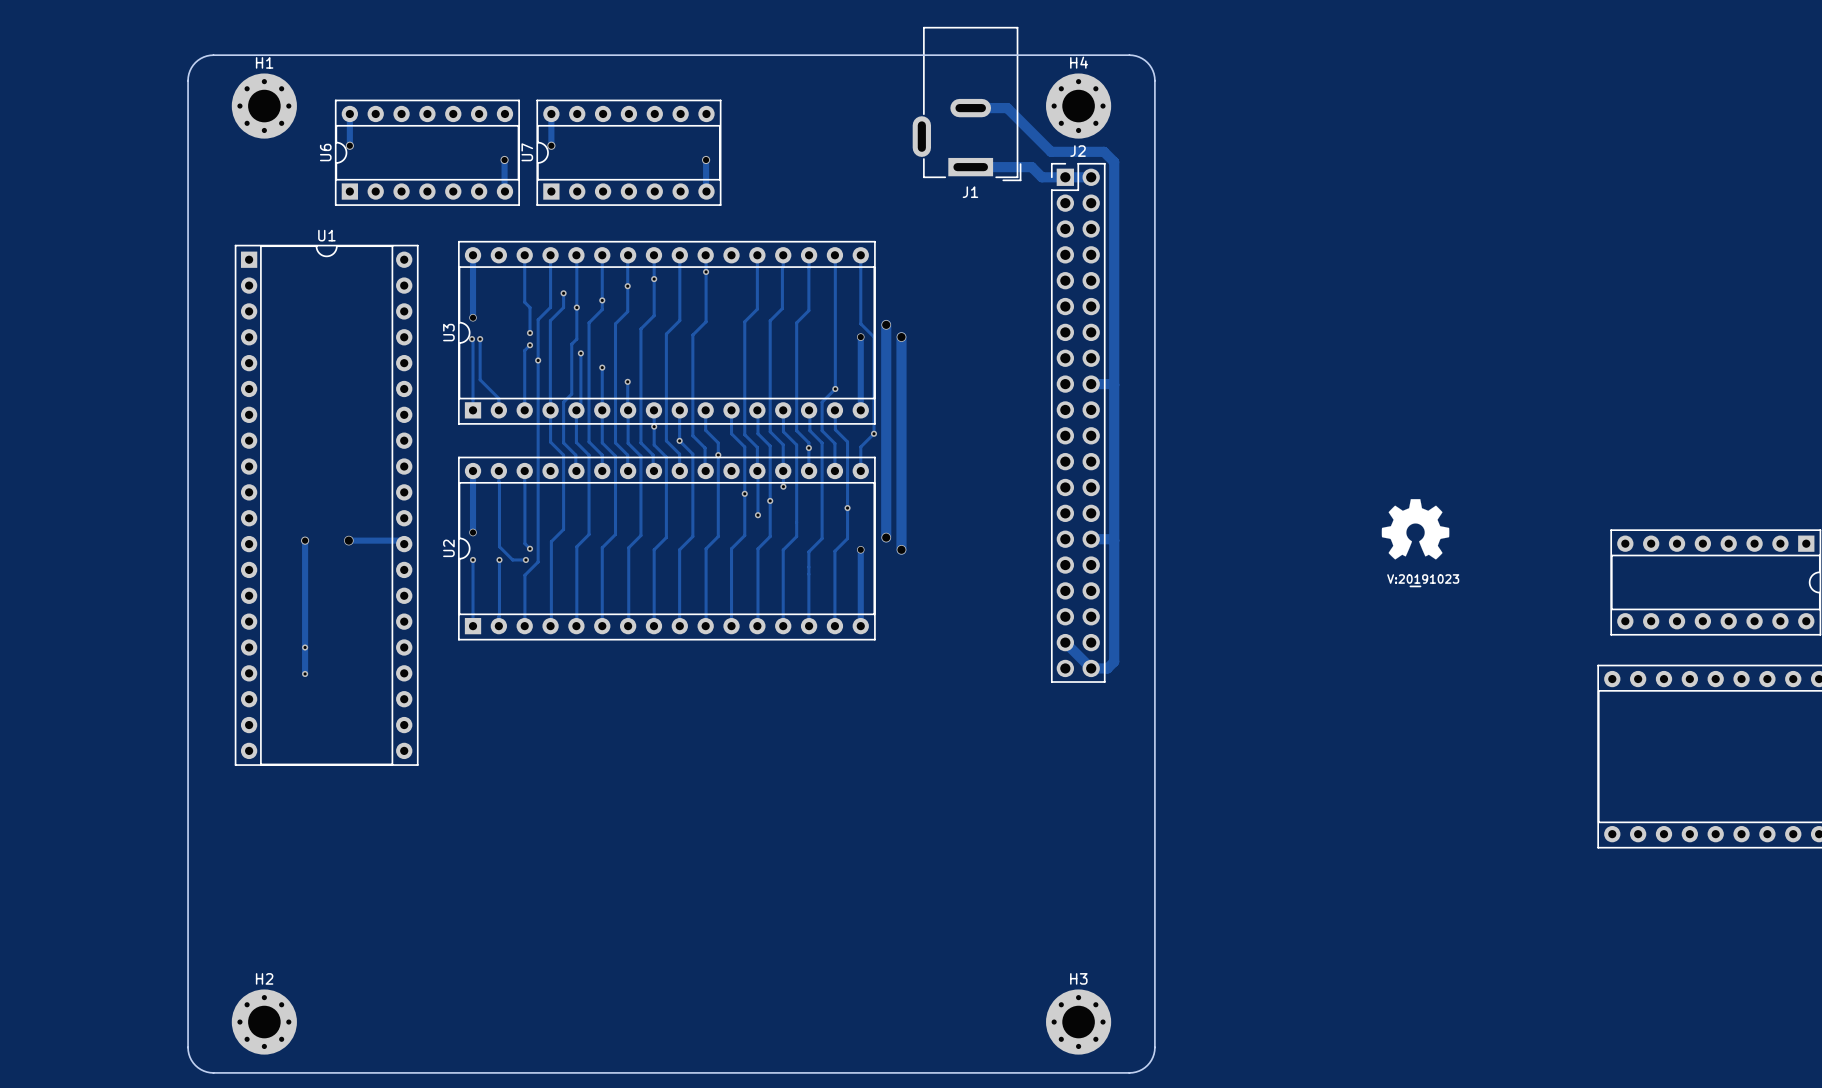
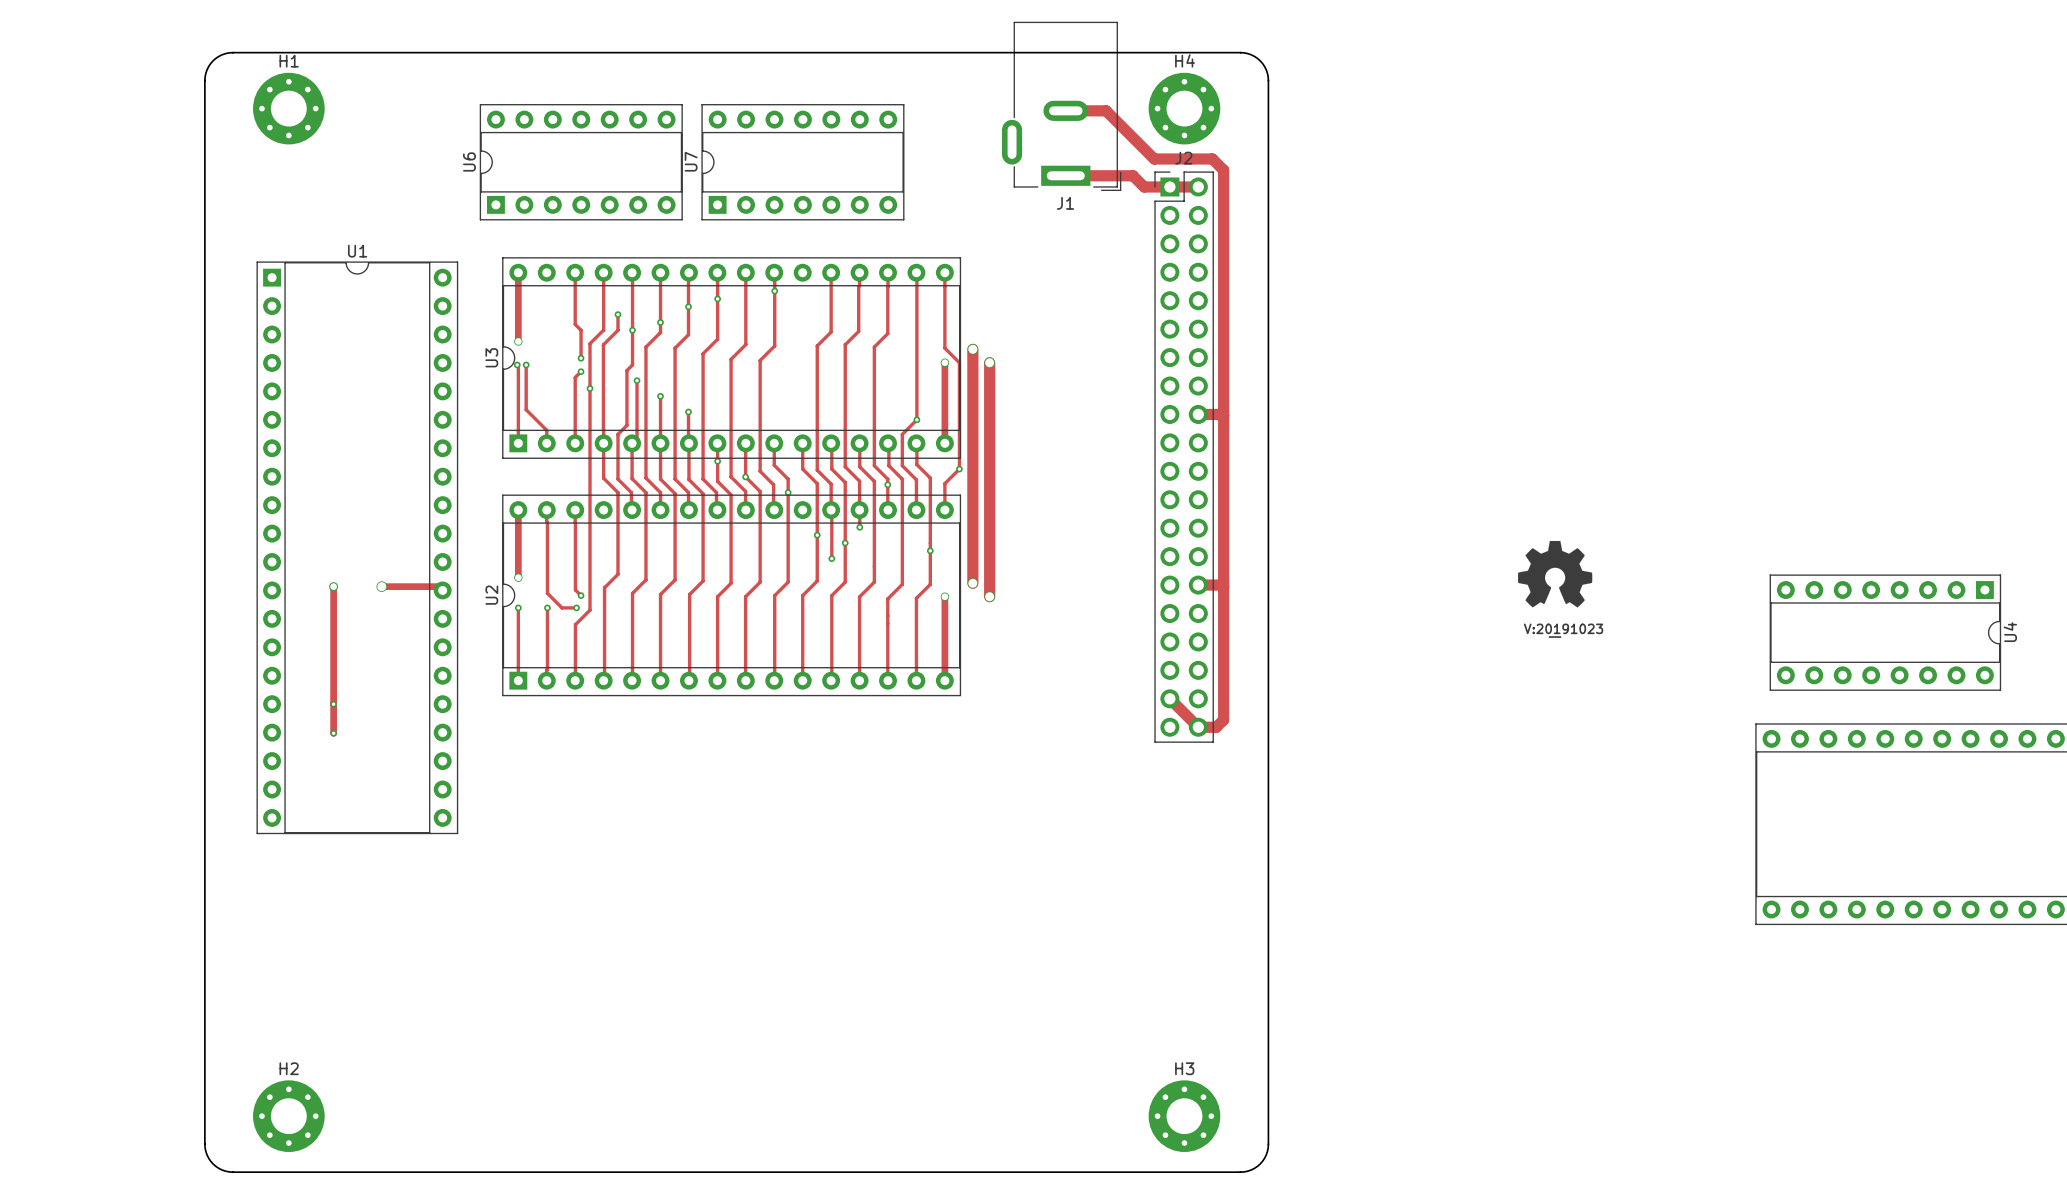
track: (349, 113) (349, 145) -> none
track: (551, 113) (551, 145) -> none
via: (349, 145) -> none
via: (551, 145) -> none
U6 position: (427, 152) -> (581, 162)
U7 position: (628, 152) -> (802, 162)
track: (504, 159) (504, 191) -> none
via: (504, 159) -> none
track: (706, 159) (706, 191) -> none
via: (706, 159) -> none

